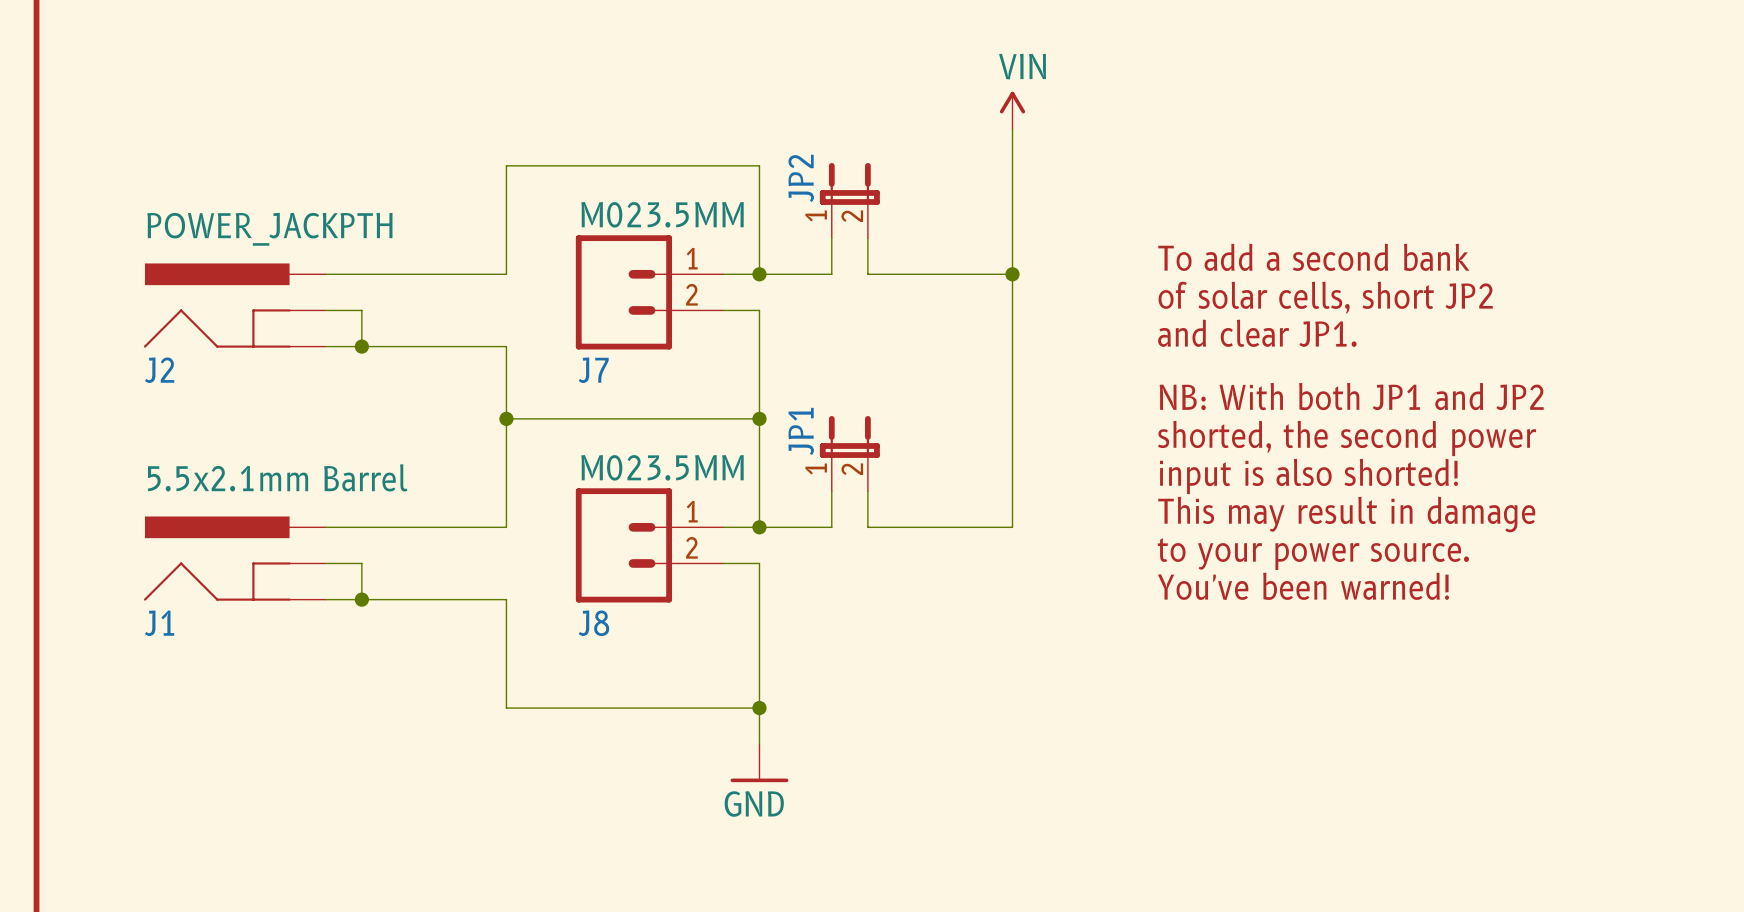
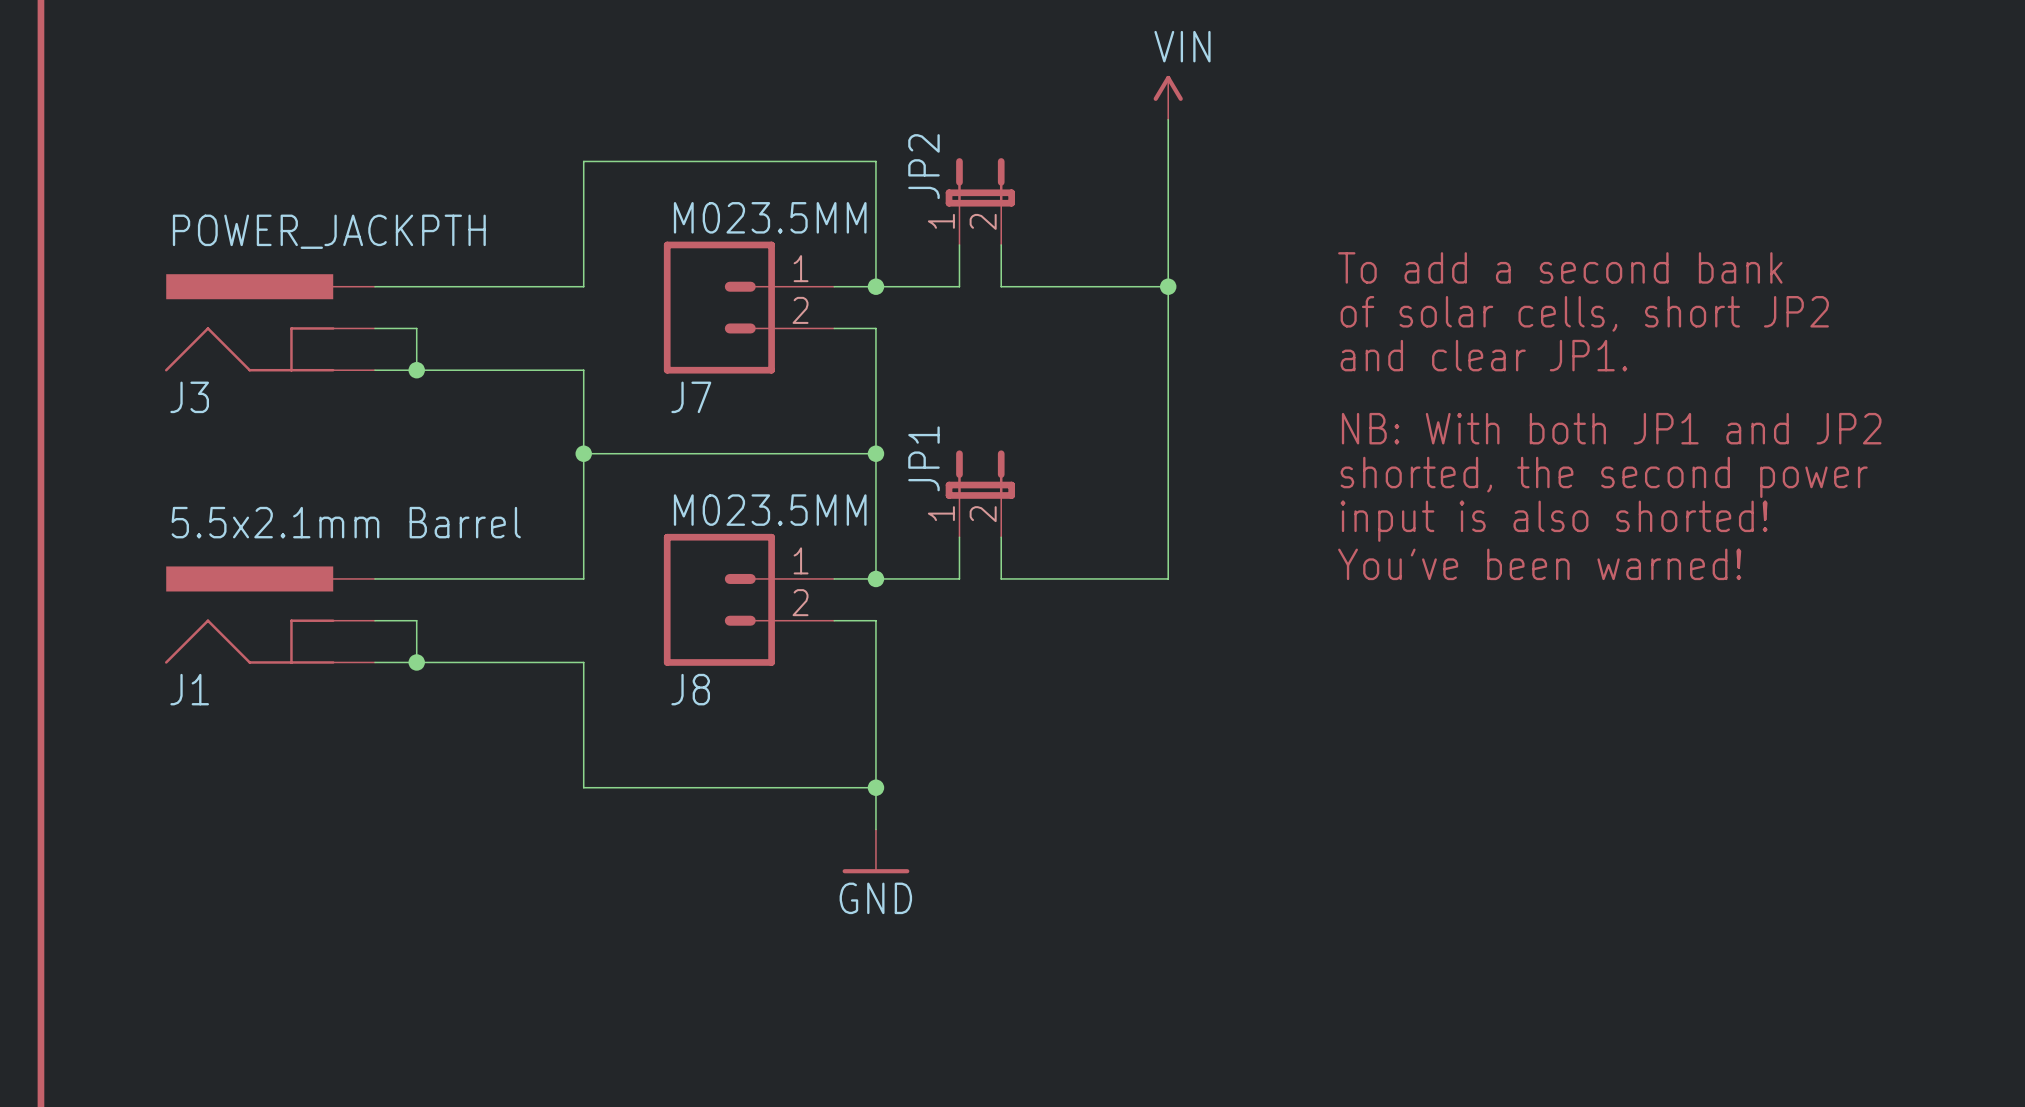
J2 name: J2 (159, 370) -> J3 (189, 397)
text: This may result in damage (1346, 514) -> You've been warned! (1539, 564)
text: to your power source. (1313, 554) -> none
text: You've been warned! (1303, 586) -> none

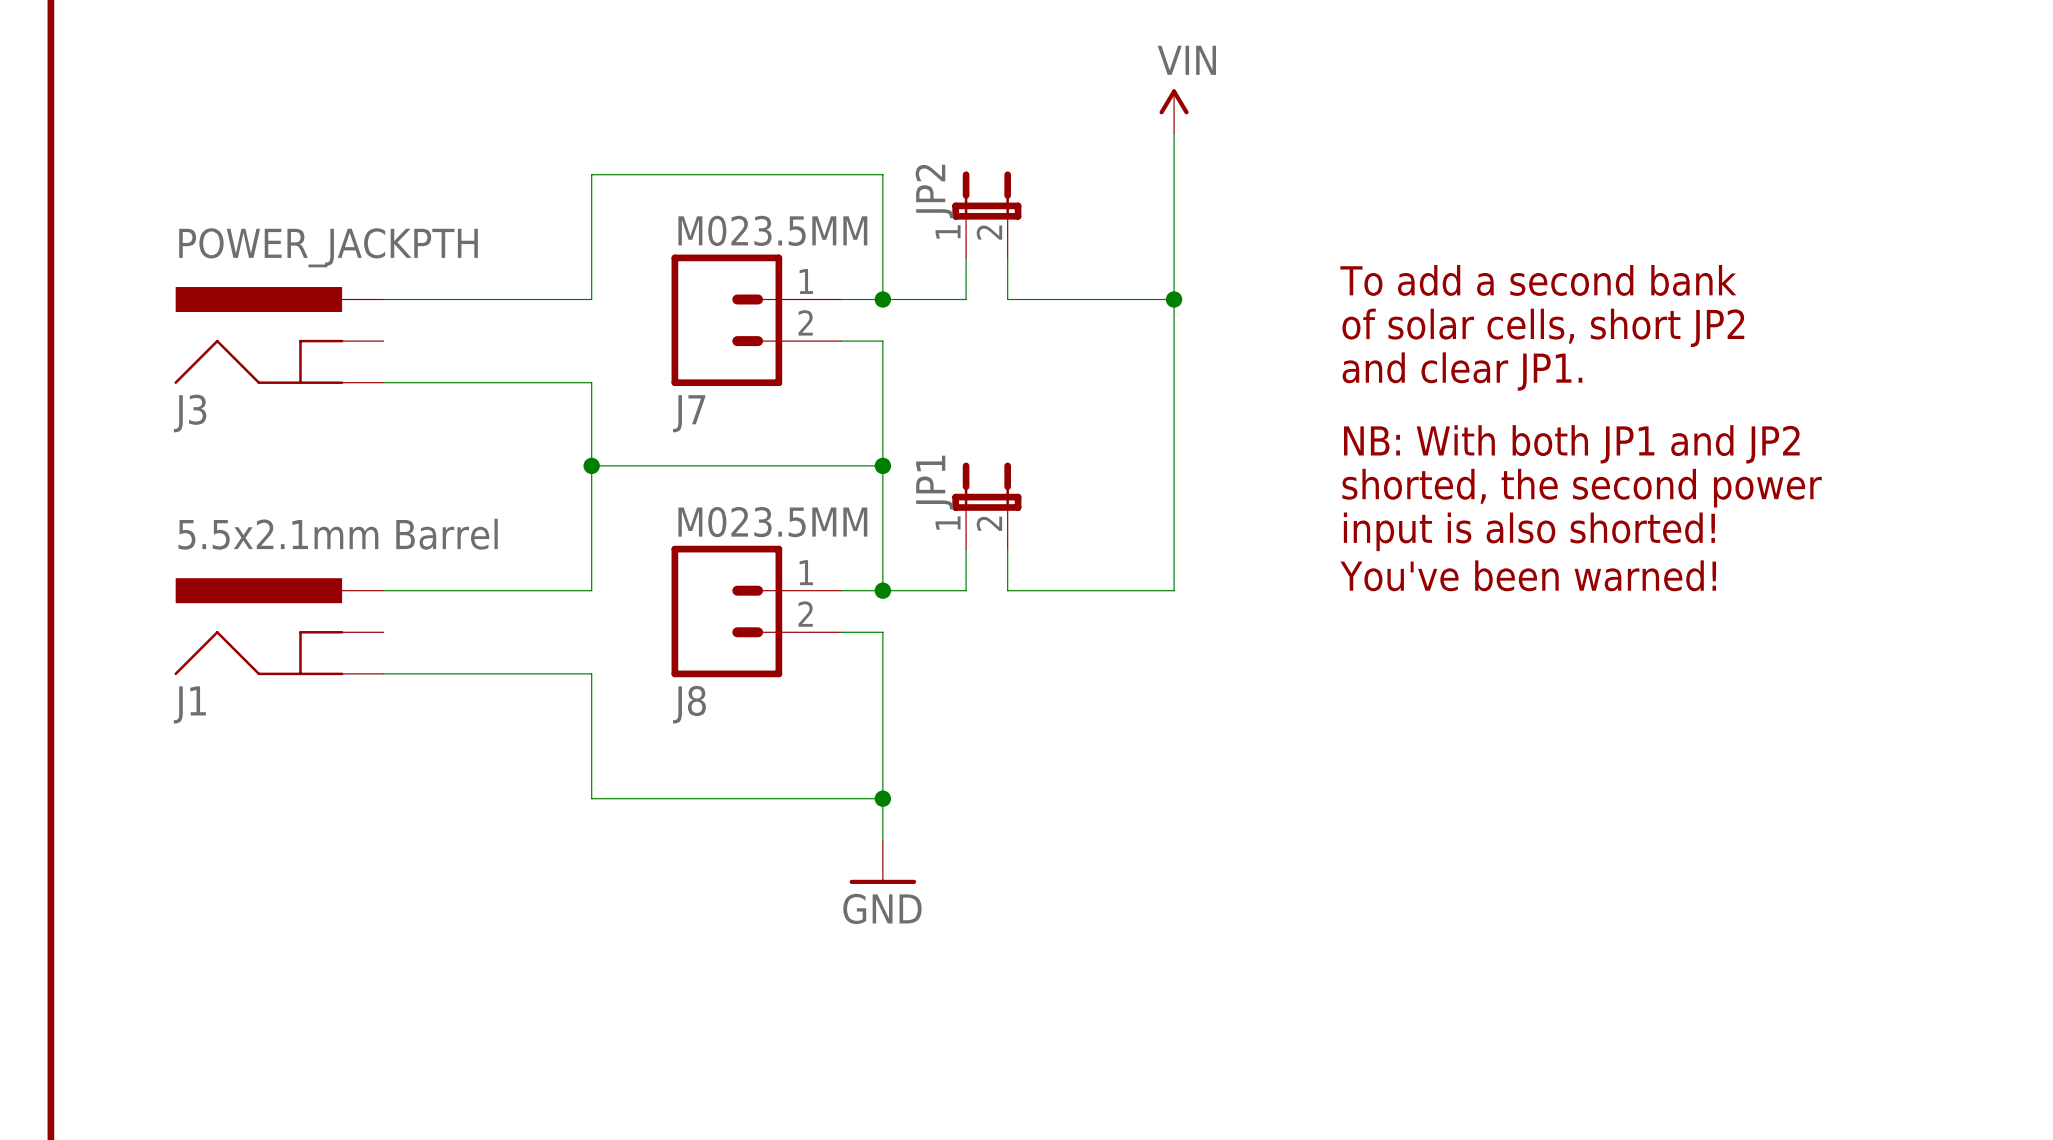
wire: (374, 328) (416, 328) (416, 370) -> none
junction: (416, 370) -> none
wire: (374, 620) (416, 620) (416, 662) -> none
junction: (416, 662) -> none

